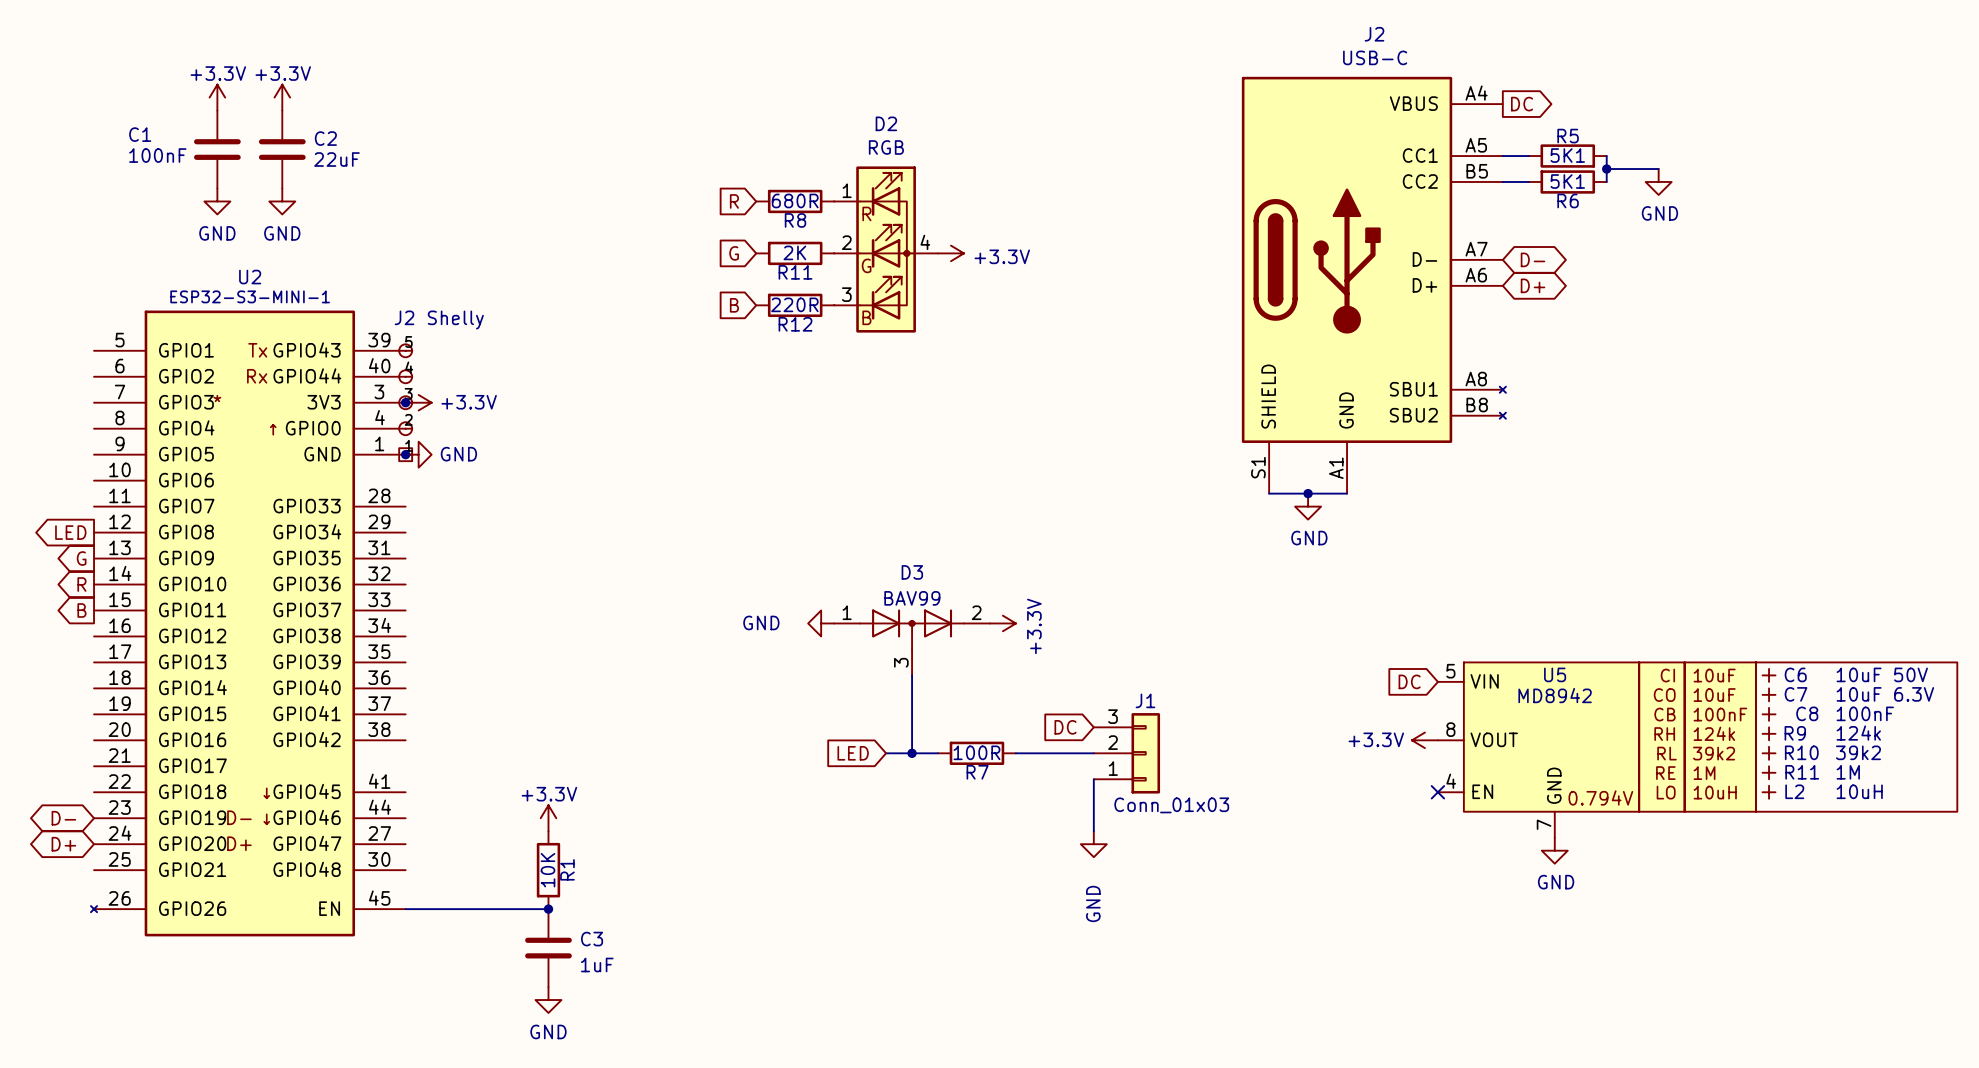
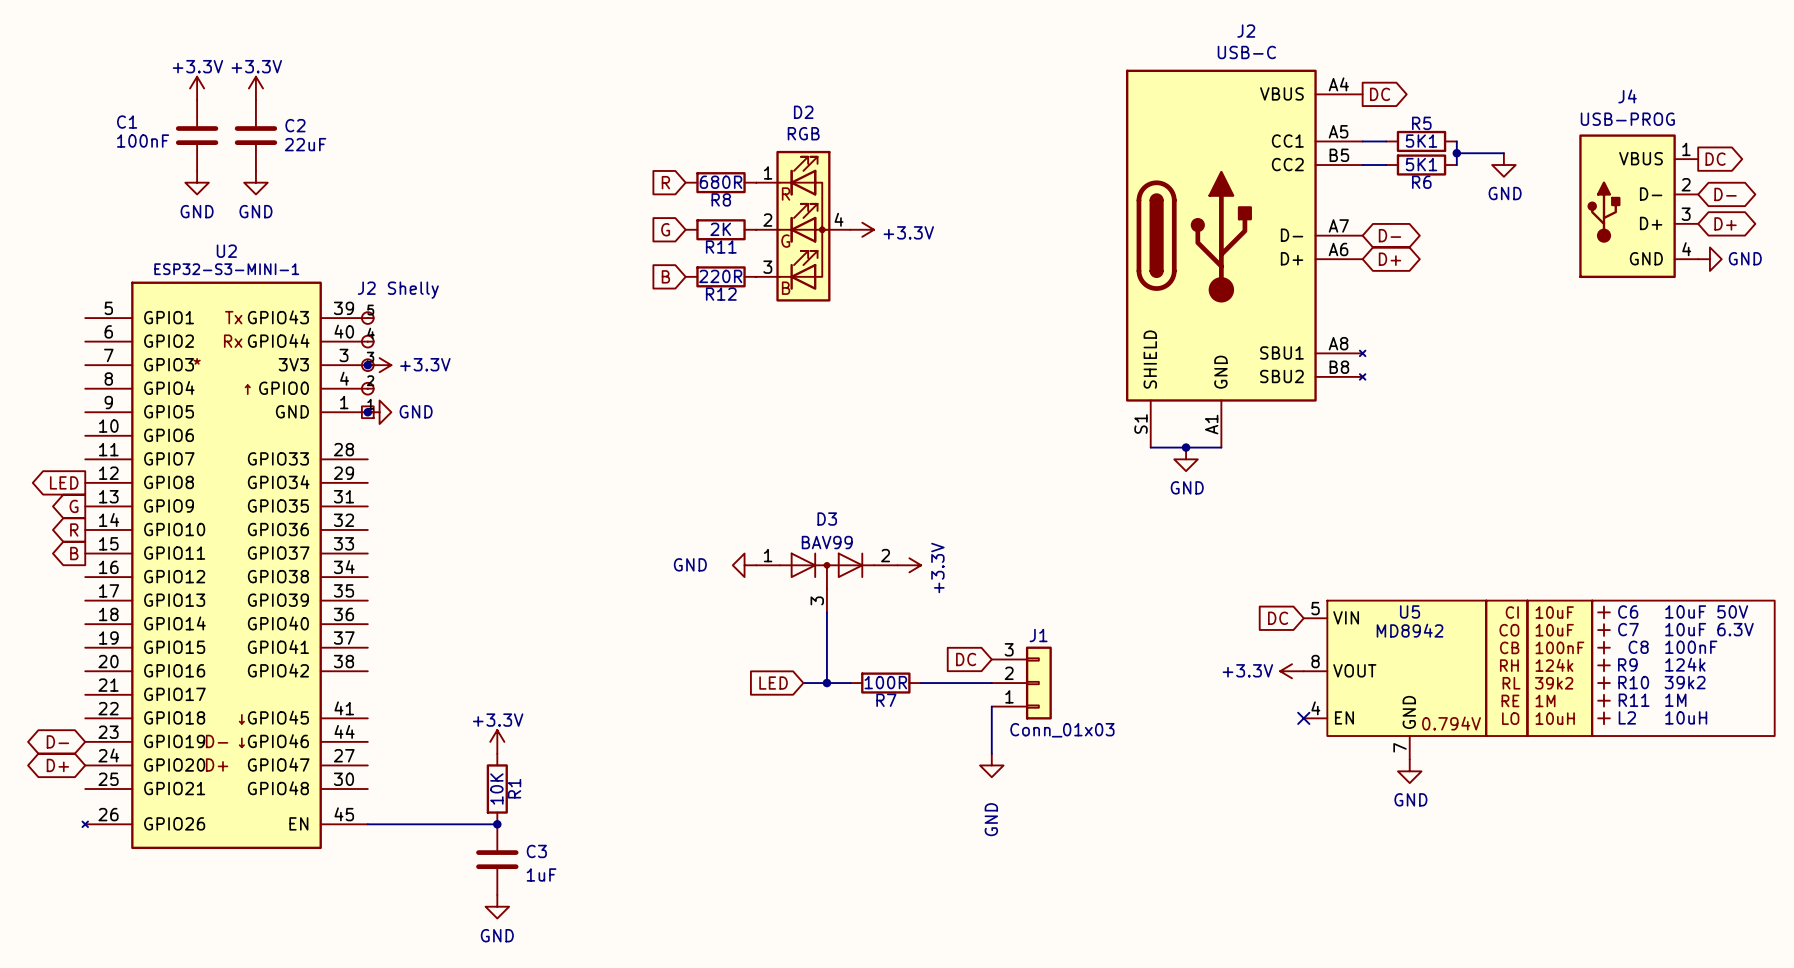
global label: none -> DC (1715, 159)
global label: none -> D- (1725, 194)
J4: none -> USB-PROG (1638, 206)
global label: none -> D+ (1725, 223)
power symbol: none -> GND (1709, 259)

